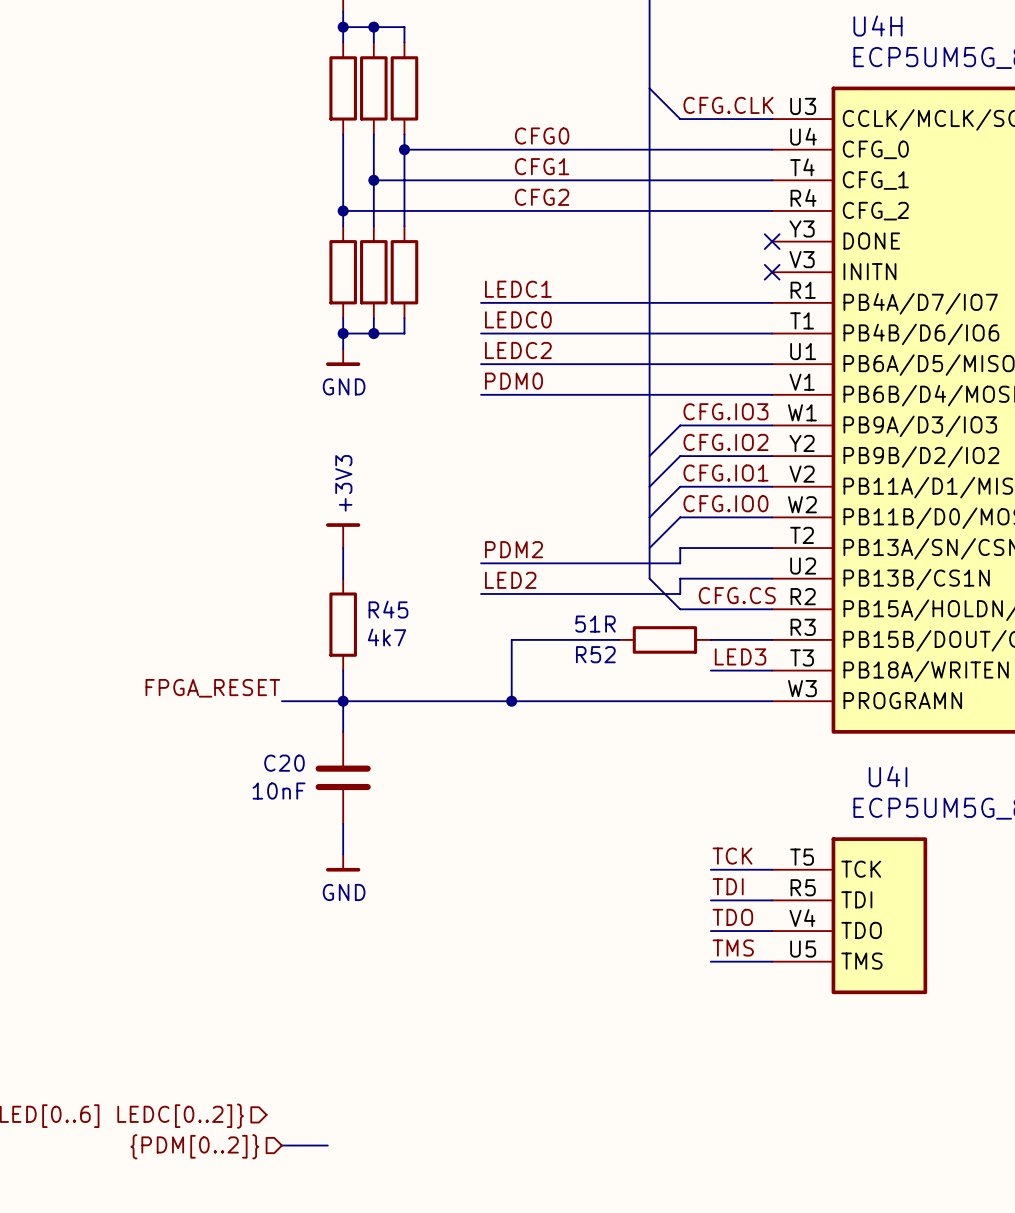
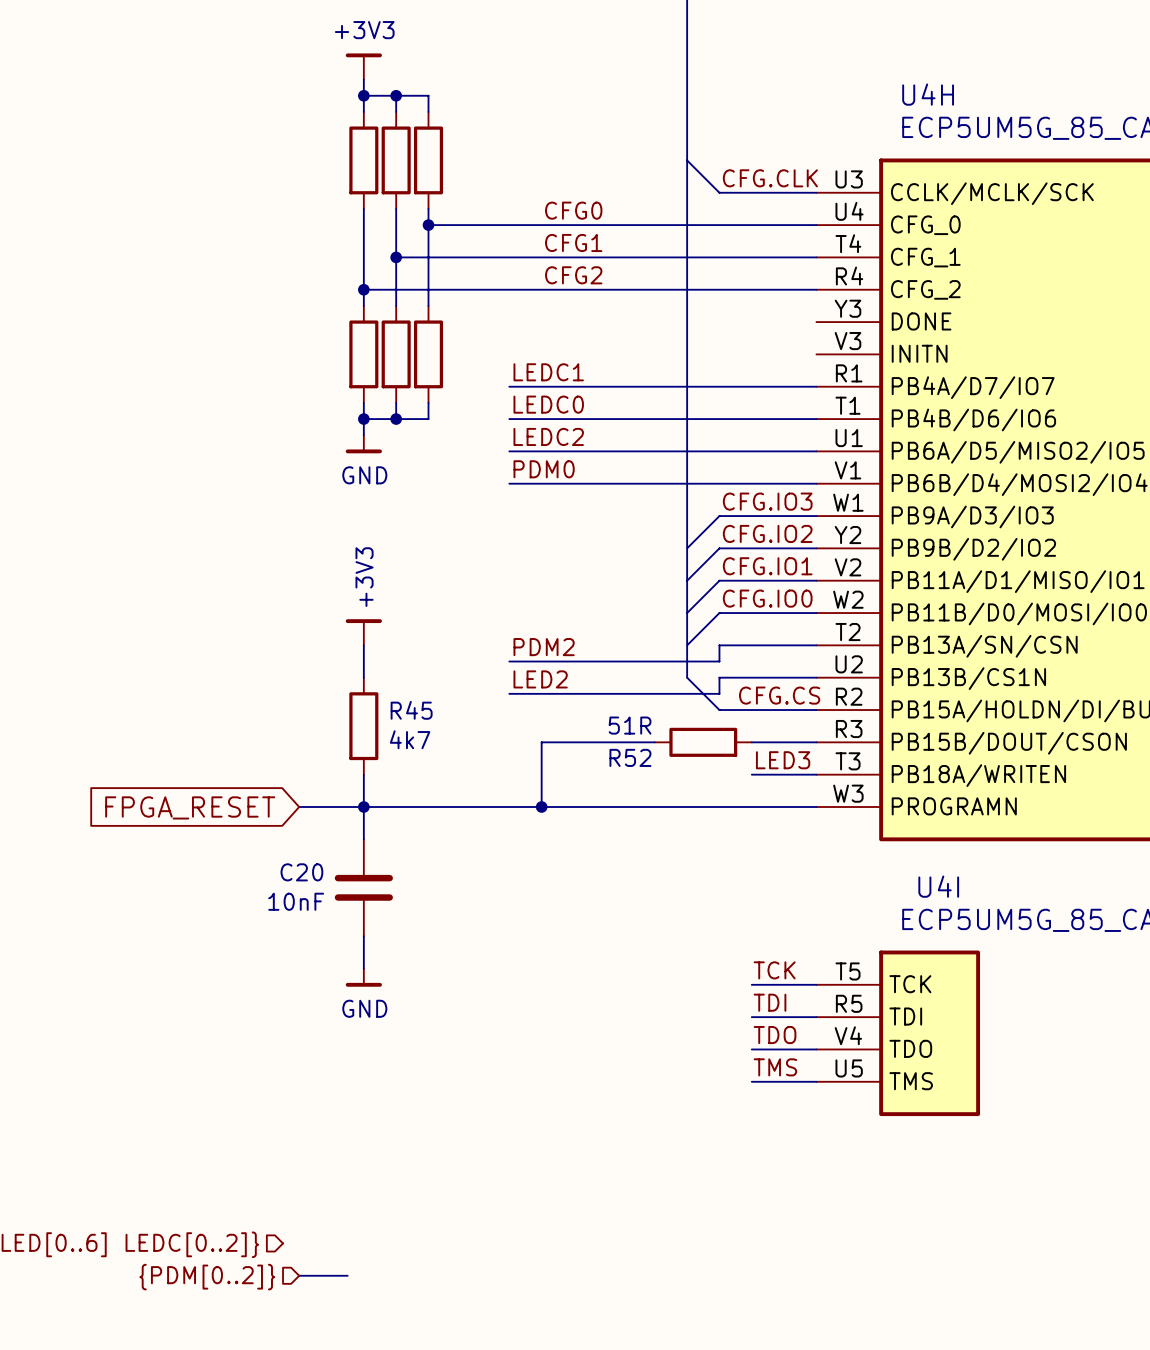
no-connect mark: (772, 241) -> none
no-connect mark: (772, 272) -> none
label: FPGA_RESET (212, 688) -> none
global label: none -> FPGA_RESET (190, 807)

